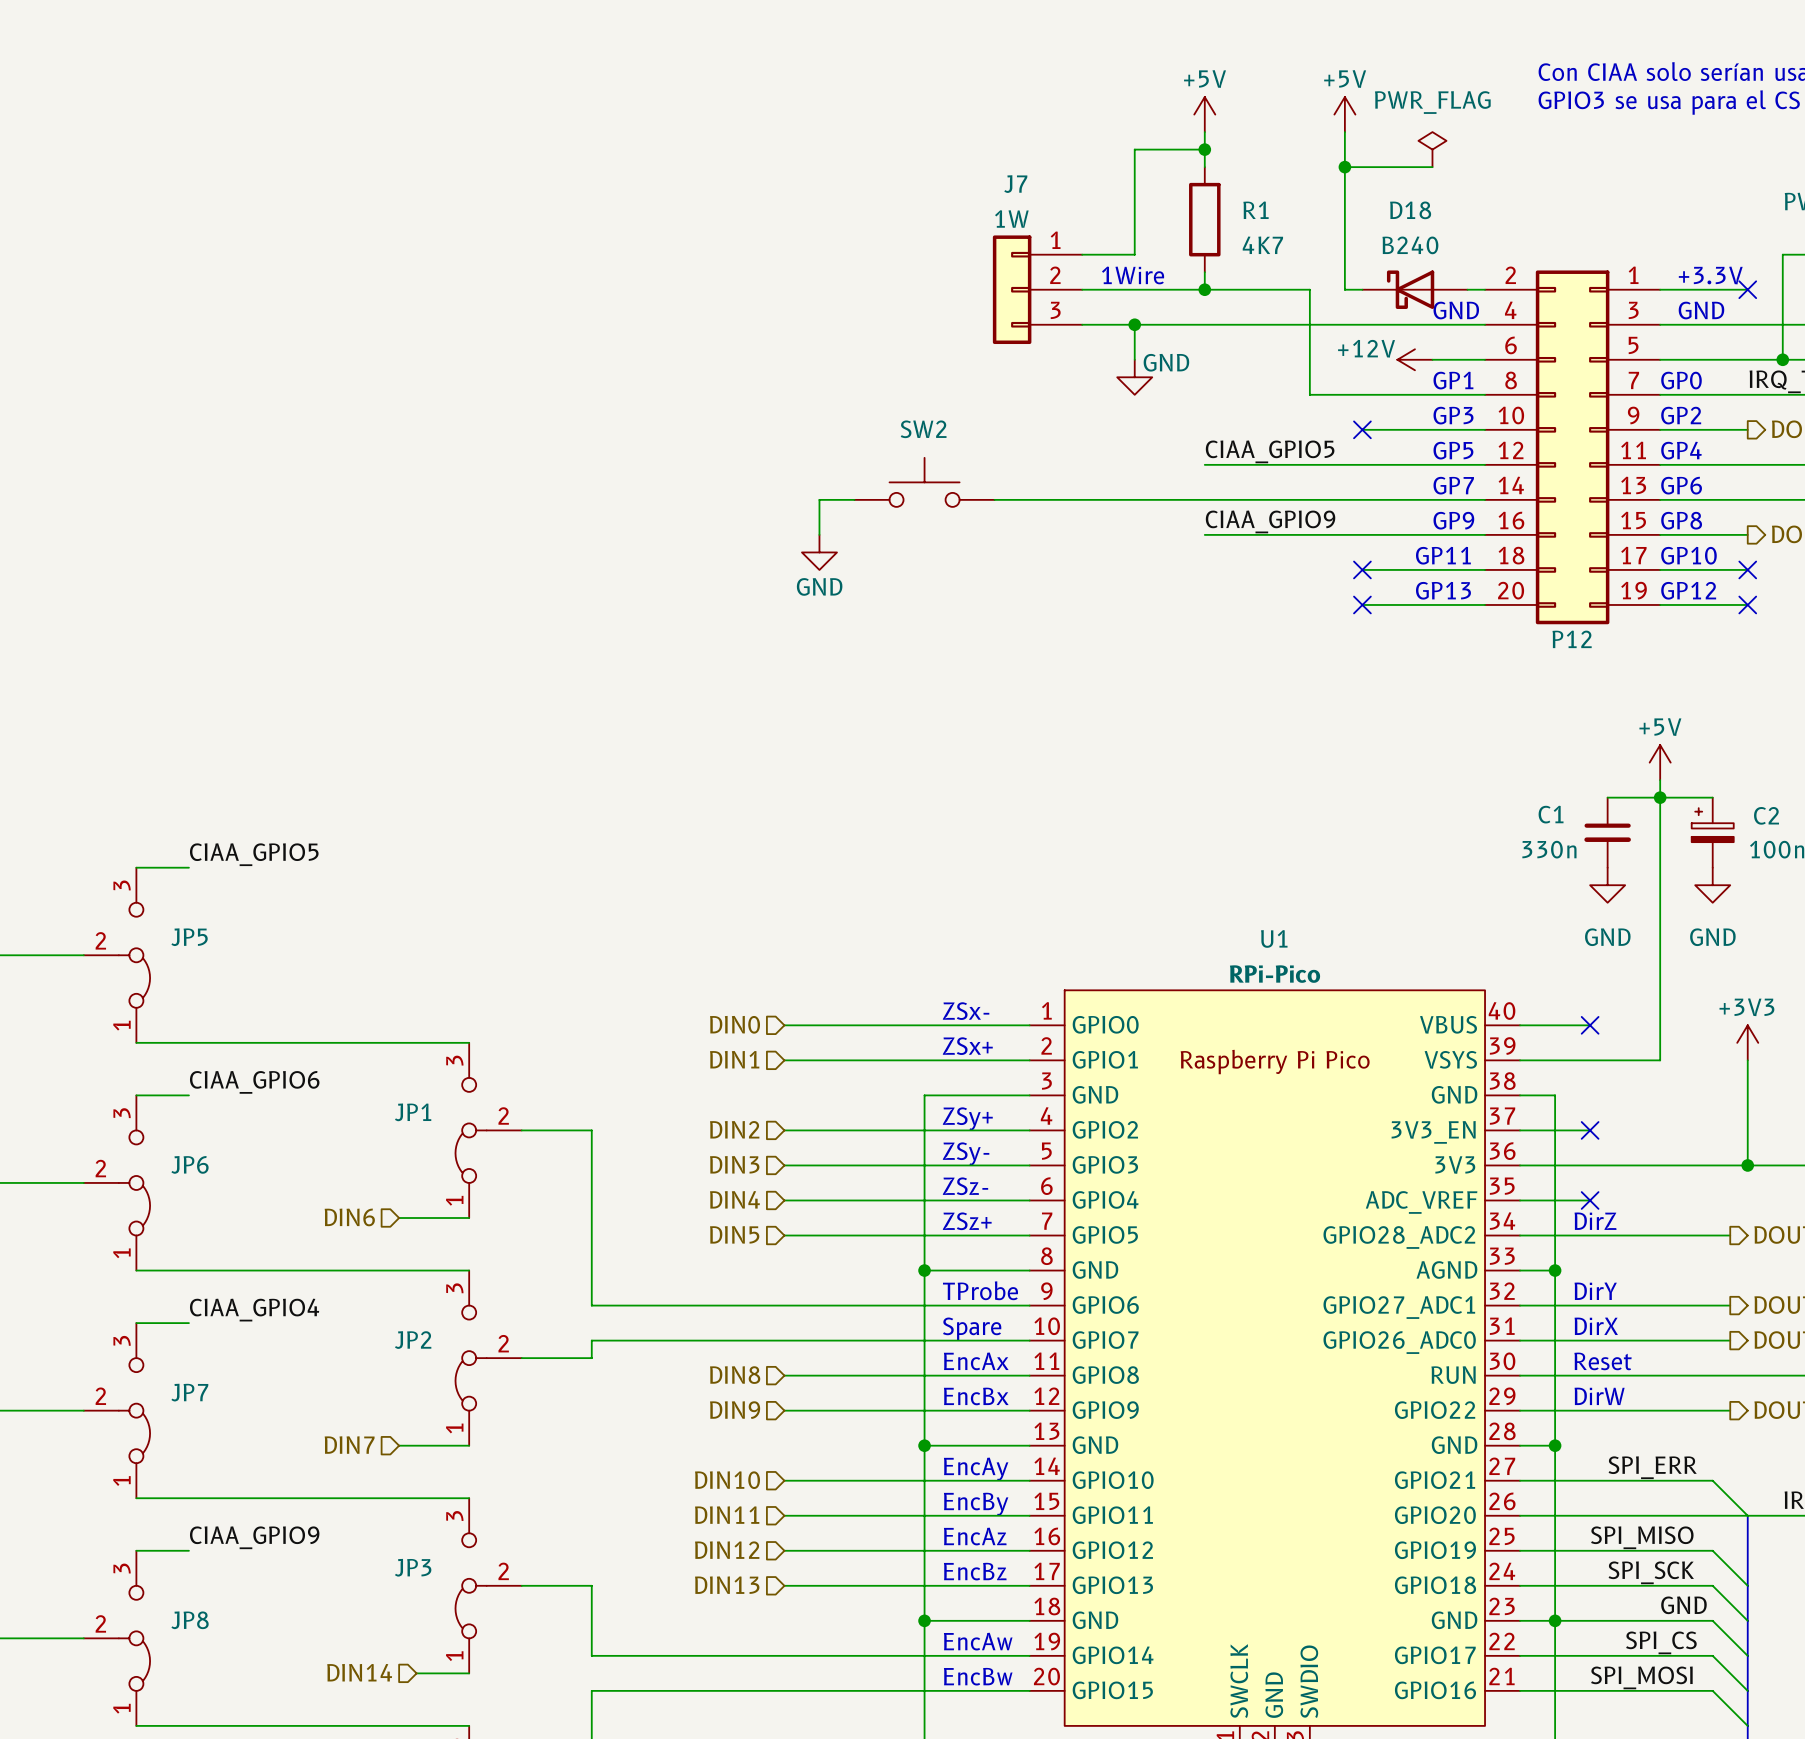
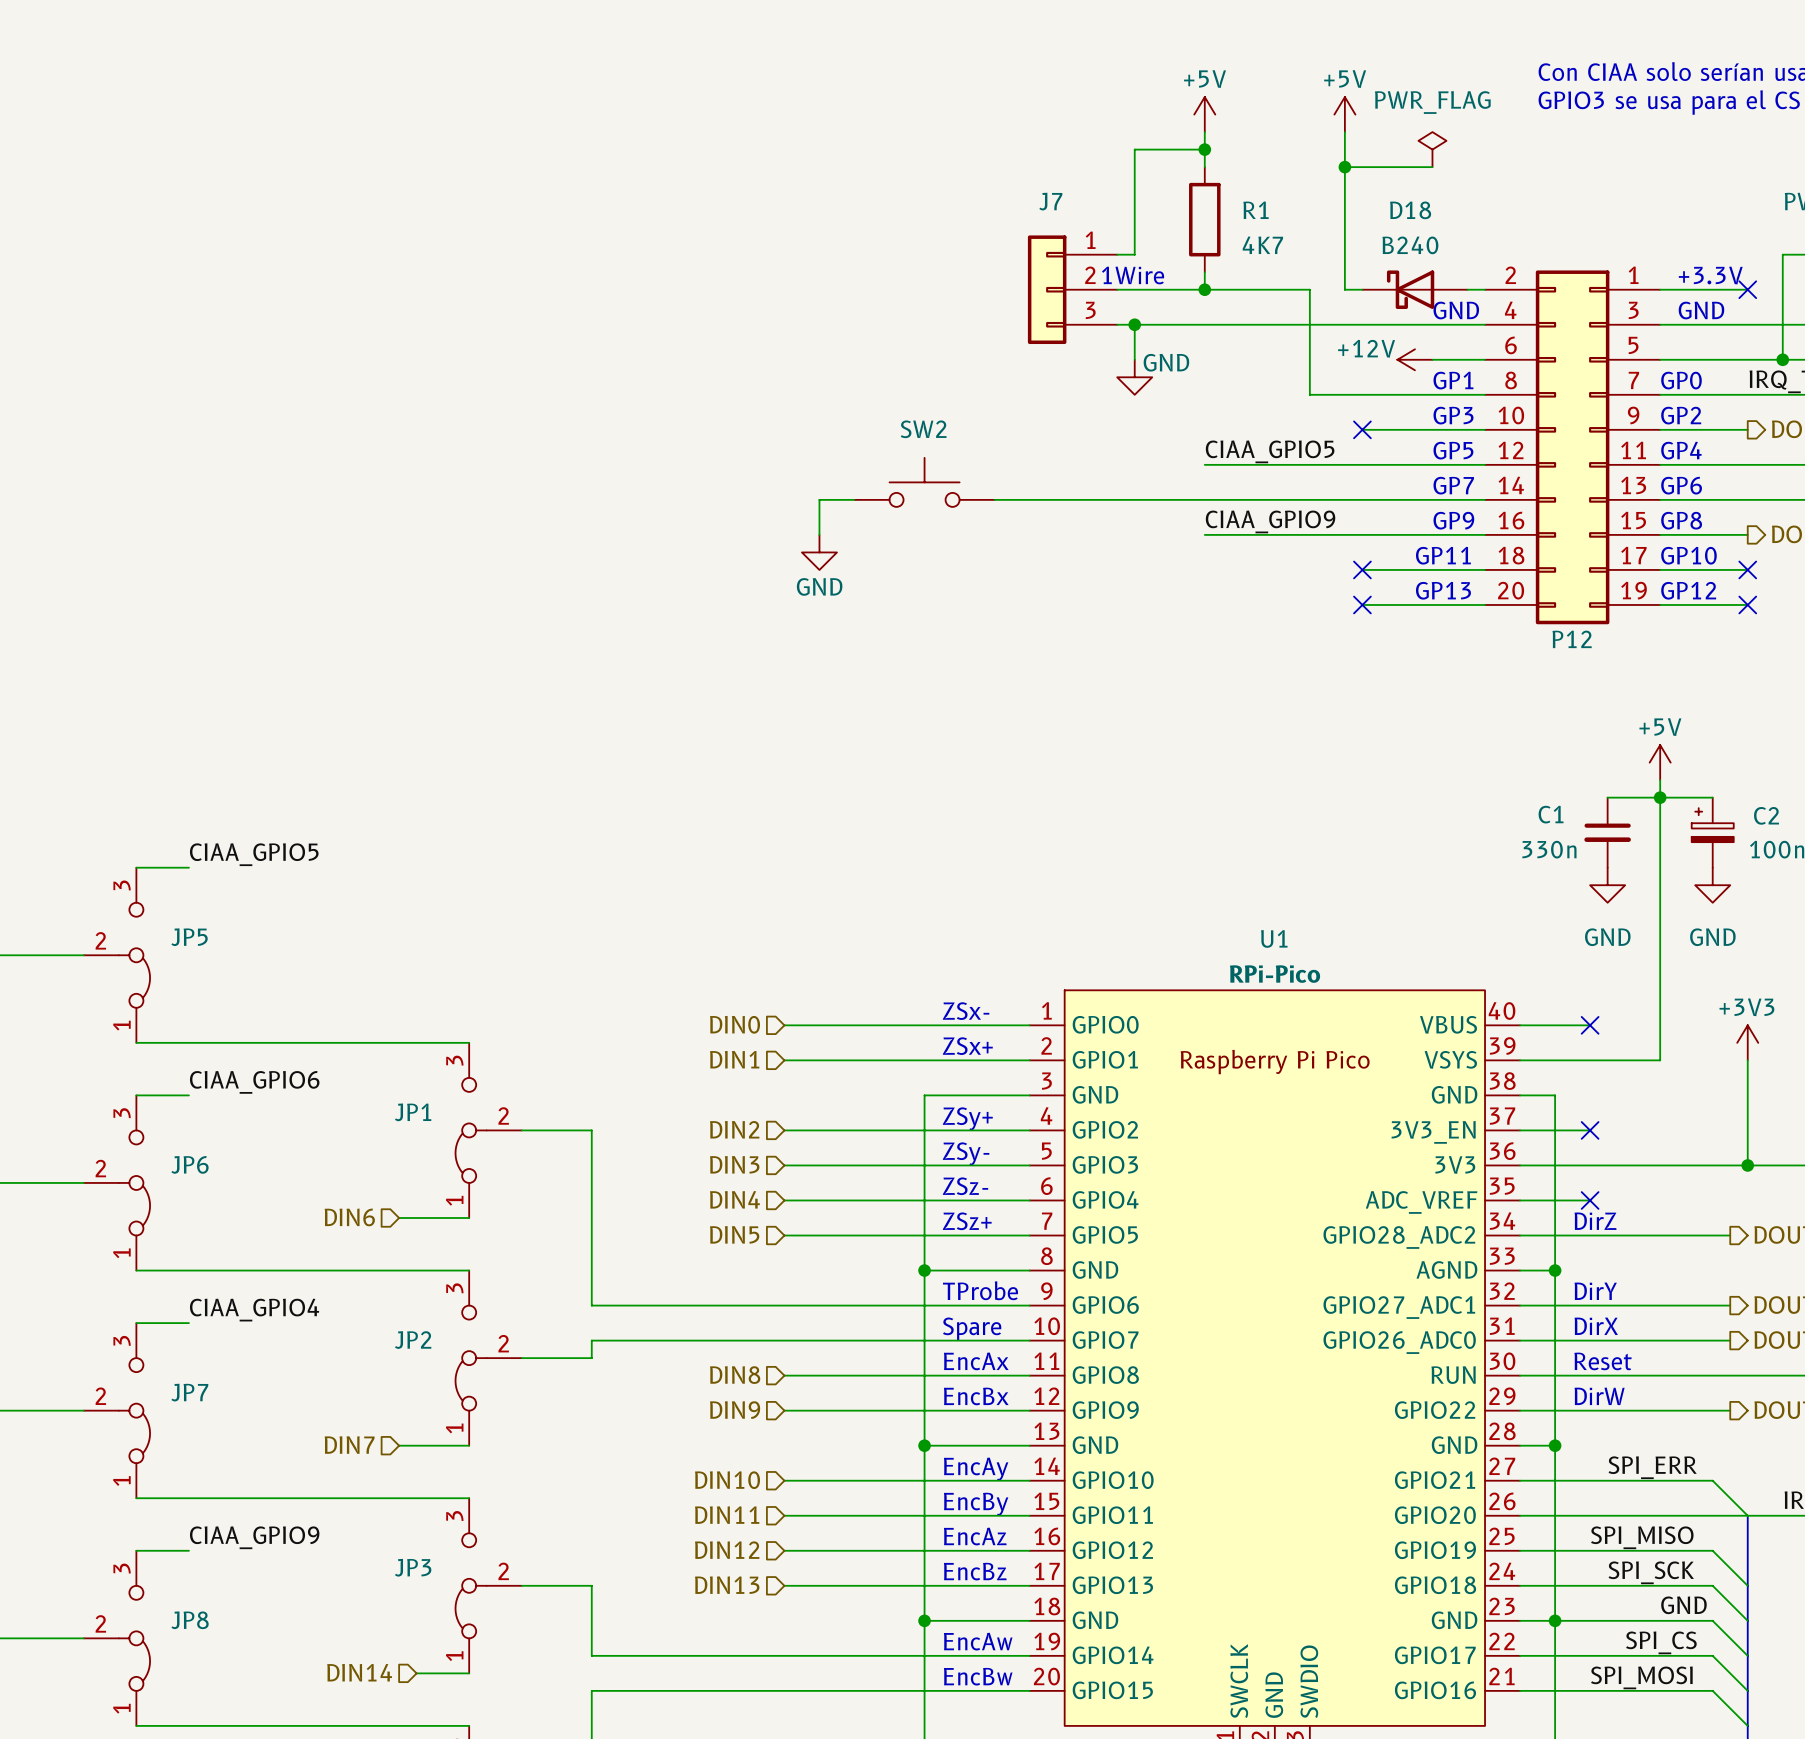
J7 name position: J7 (1015, 184) -> J7 (1050, 201)
J7 value: 1W (1011, 219) -> none
J7 position: (1037, 289) -> (1072, 289)

